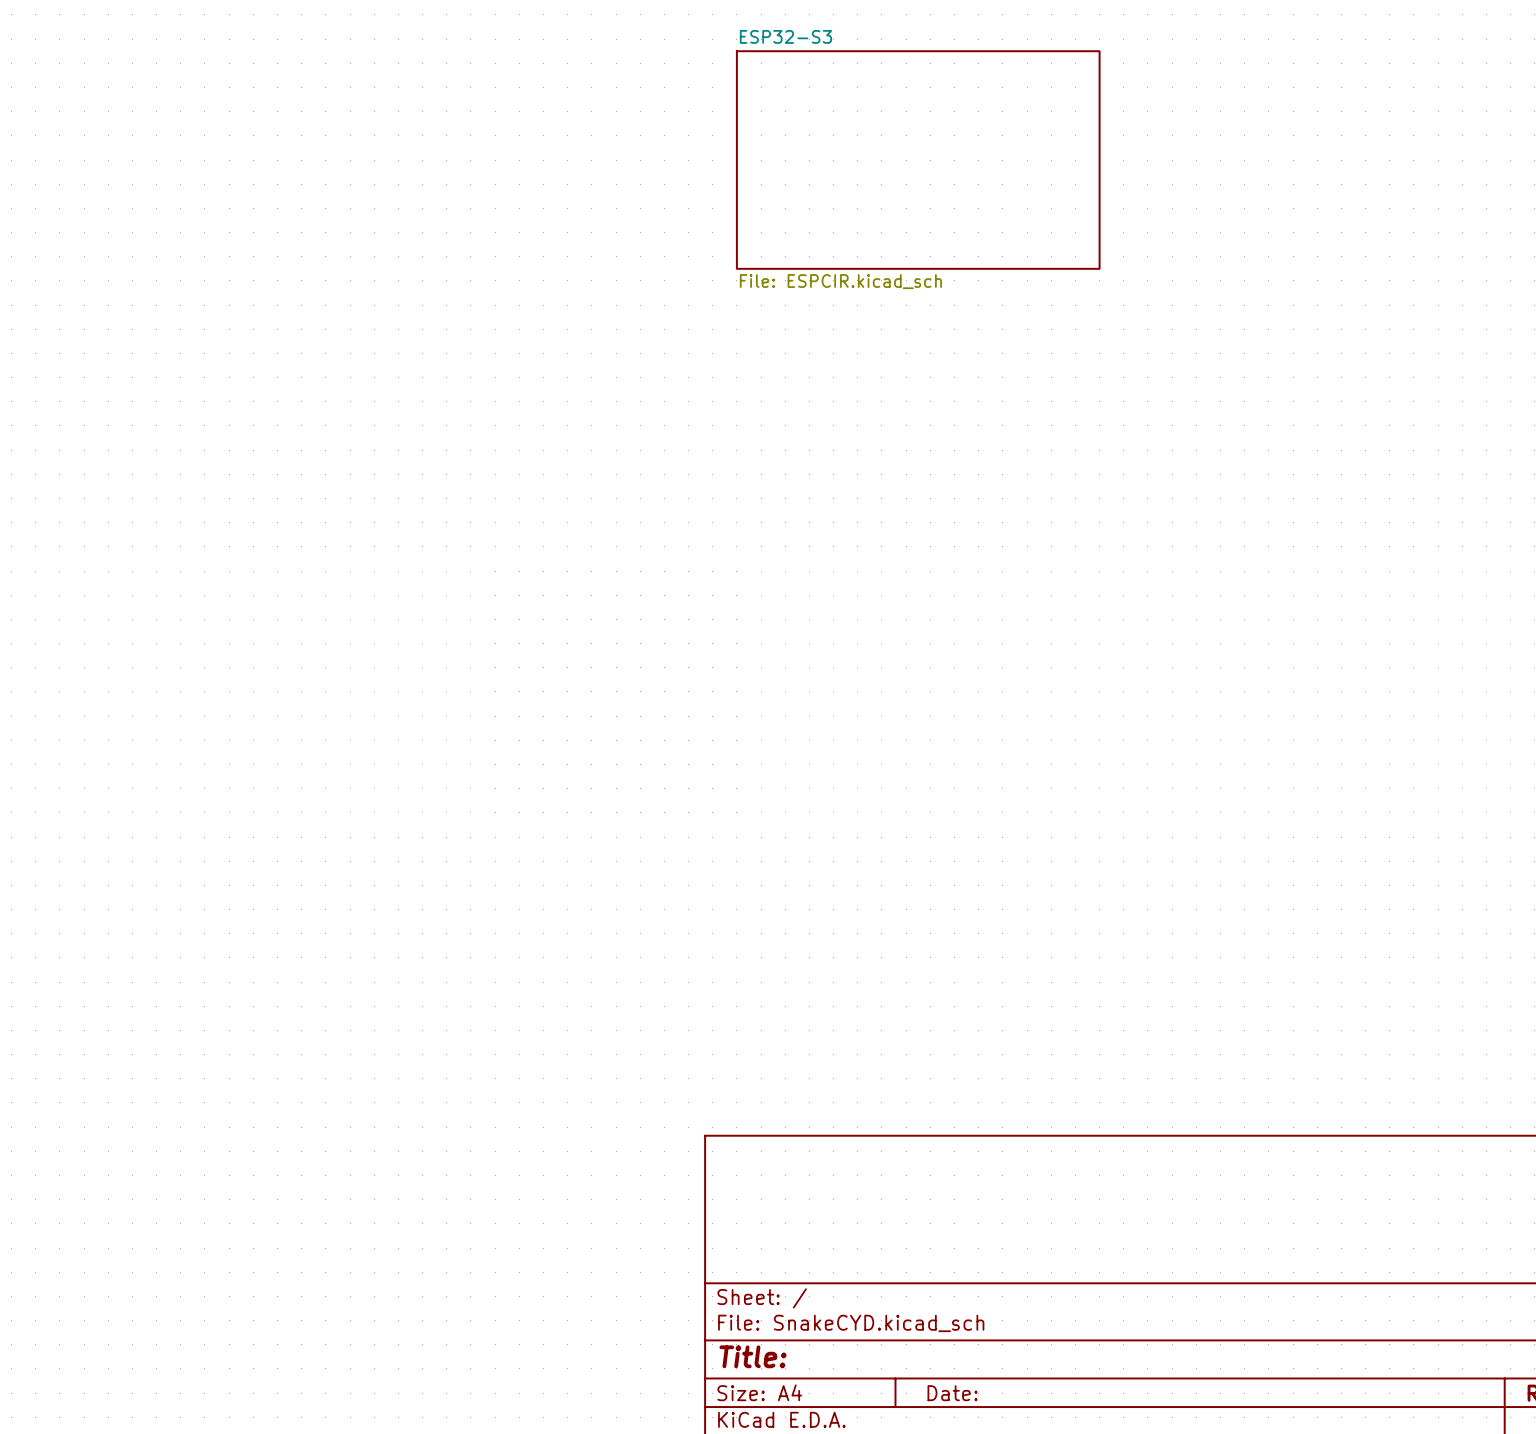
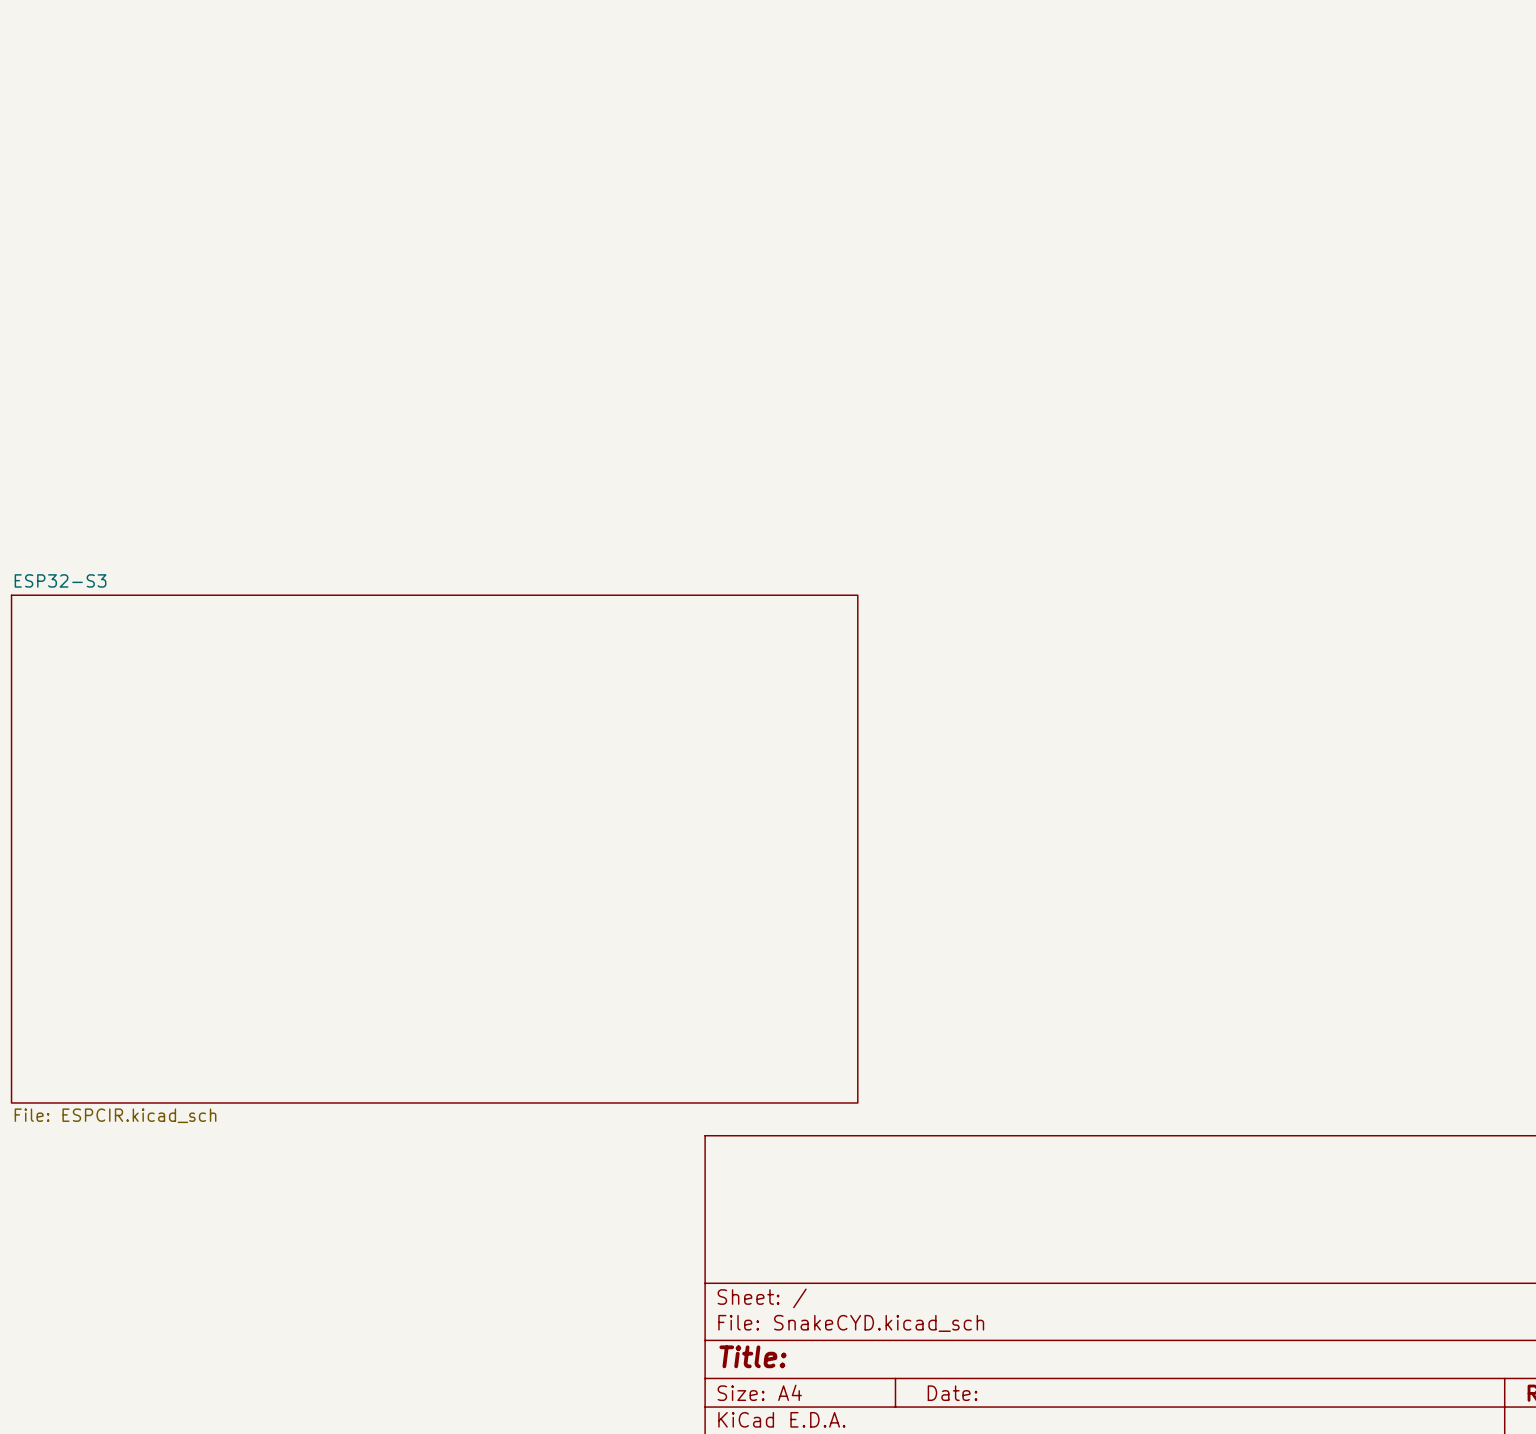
sheet ESP32-S3 name position: ESP32-S3 (785, 36) -> ESP32-S3 (60, 580)
sheet ESP32-S3 shape: [736, 50, 1101, 270] -> [10, 594, 859, 1104]
sheet ESP32-S3 value position: File: ESPCIR.kicad_sch (840, 281) -> File: ESPCIR.kicad_sch (115, 1115)

